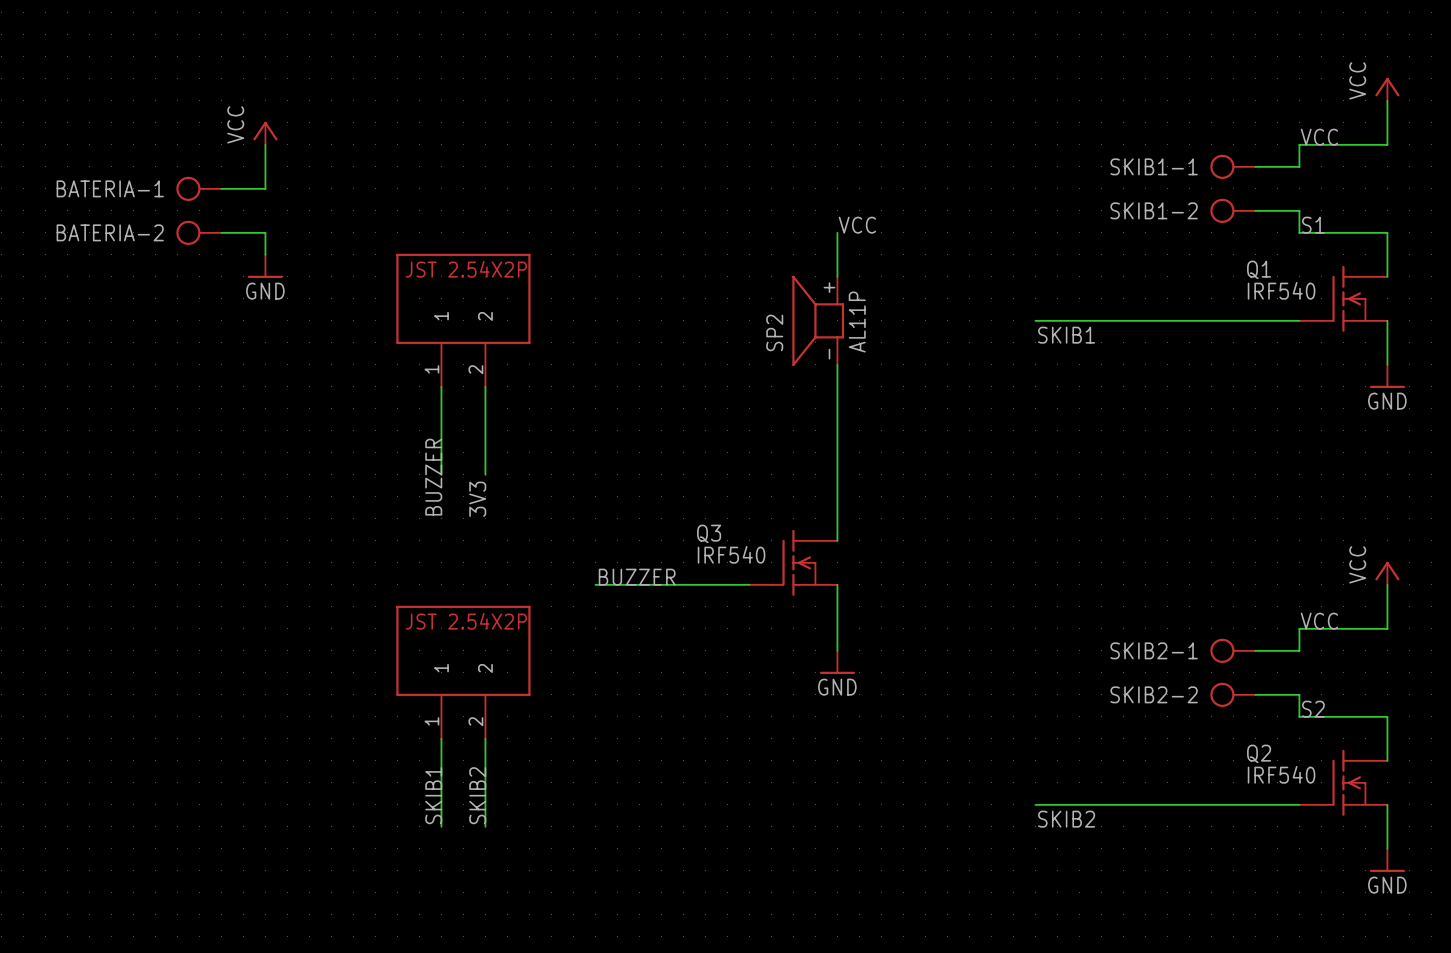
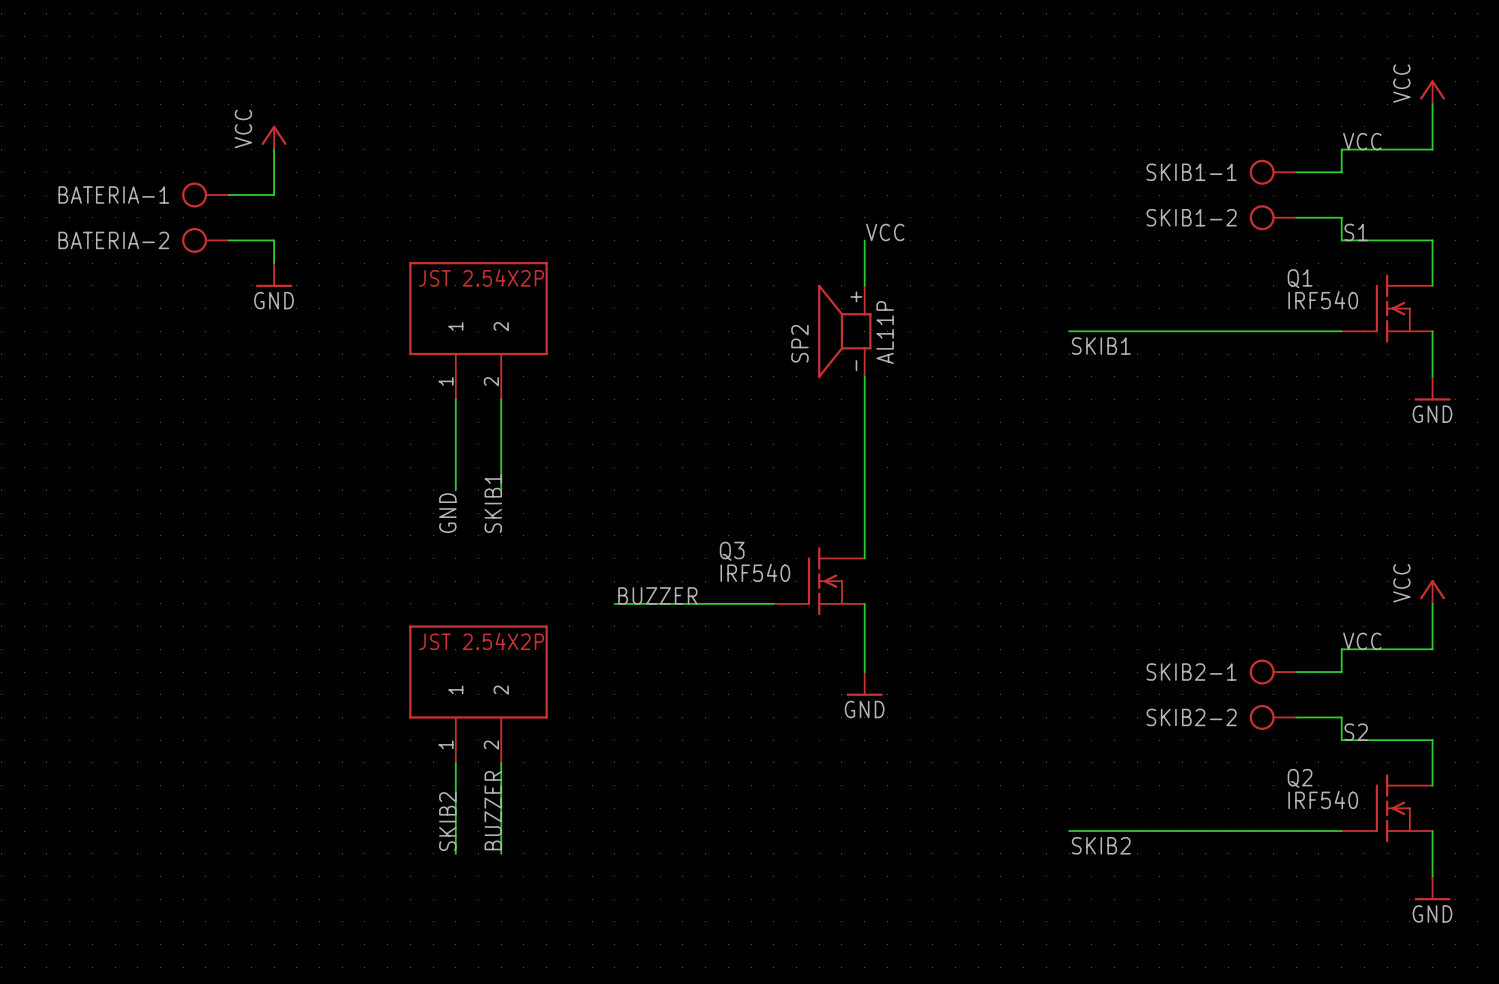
label: BUZZER (433, 477) -> GND (447, 513)
label: 3V3 (477, 499) -> SKIB1 (493, 503)
label: SKIB1 (433, 795) -> SKIB2 (447, 821)
label: SKIB2 (477, 795) -> BUZZER (493, 810)

